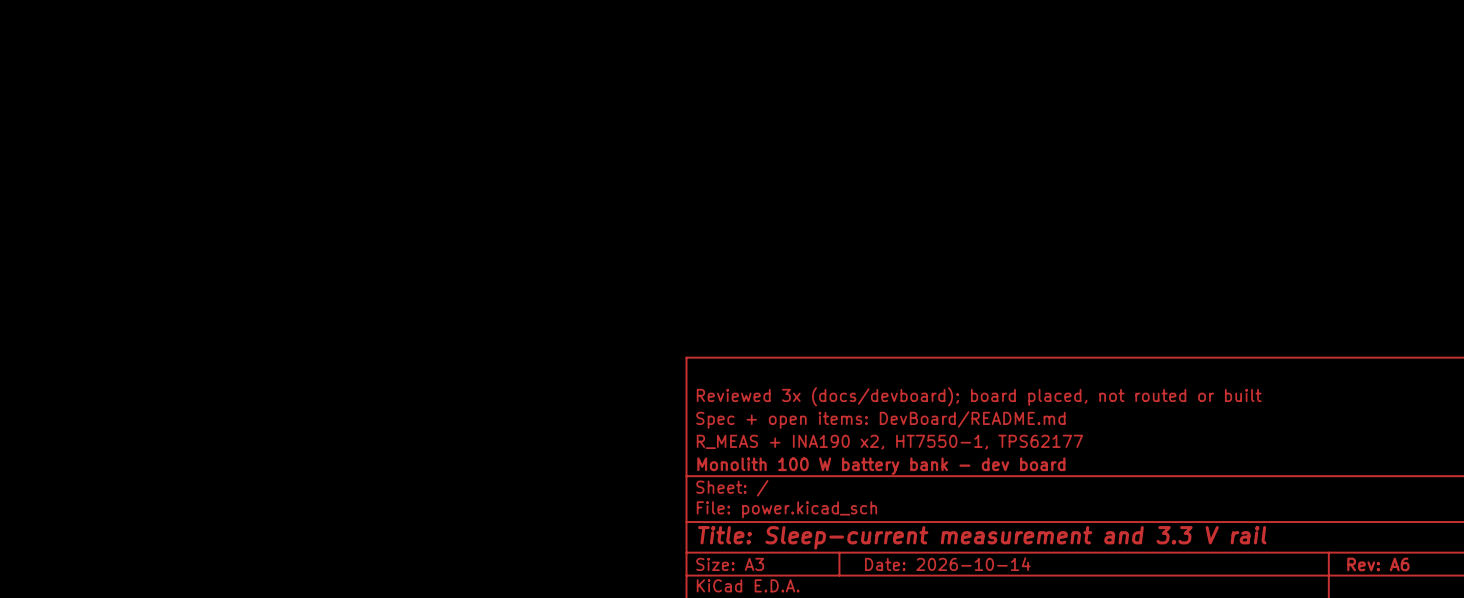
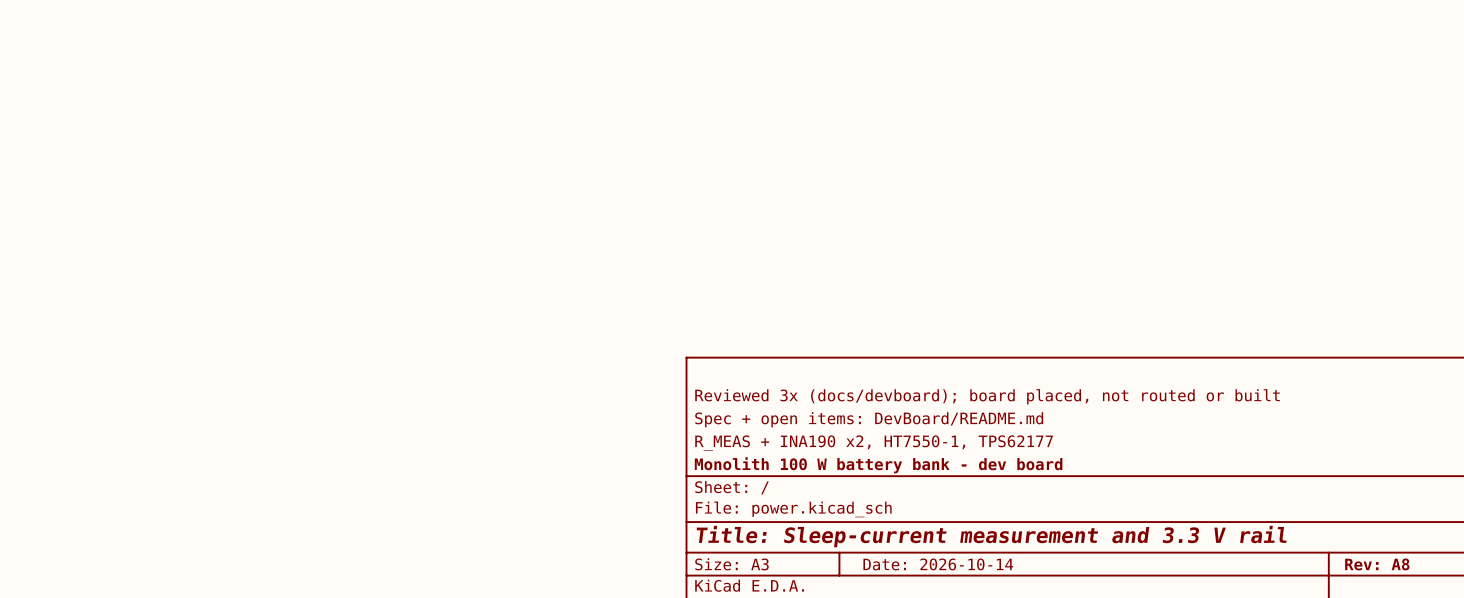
title block: Rev: A6 (1378, 564) -> Rev: A8 (1377, 564)

